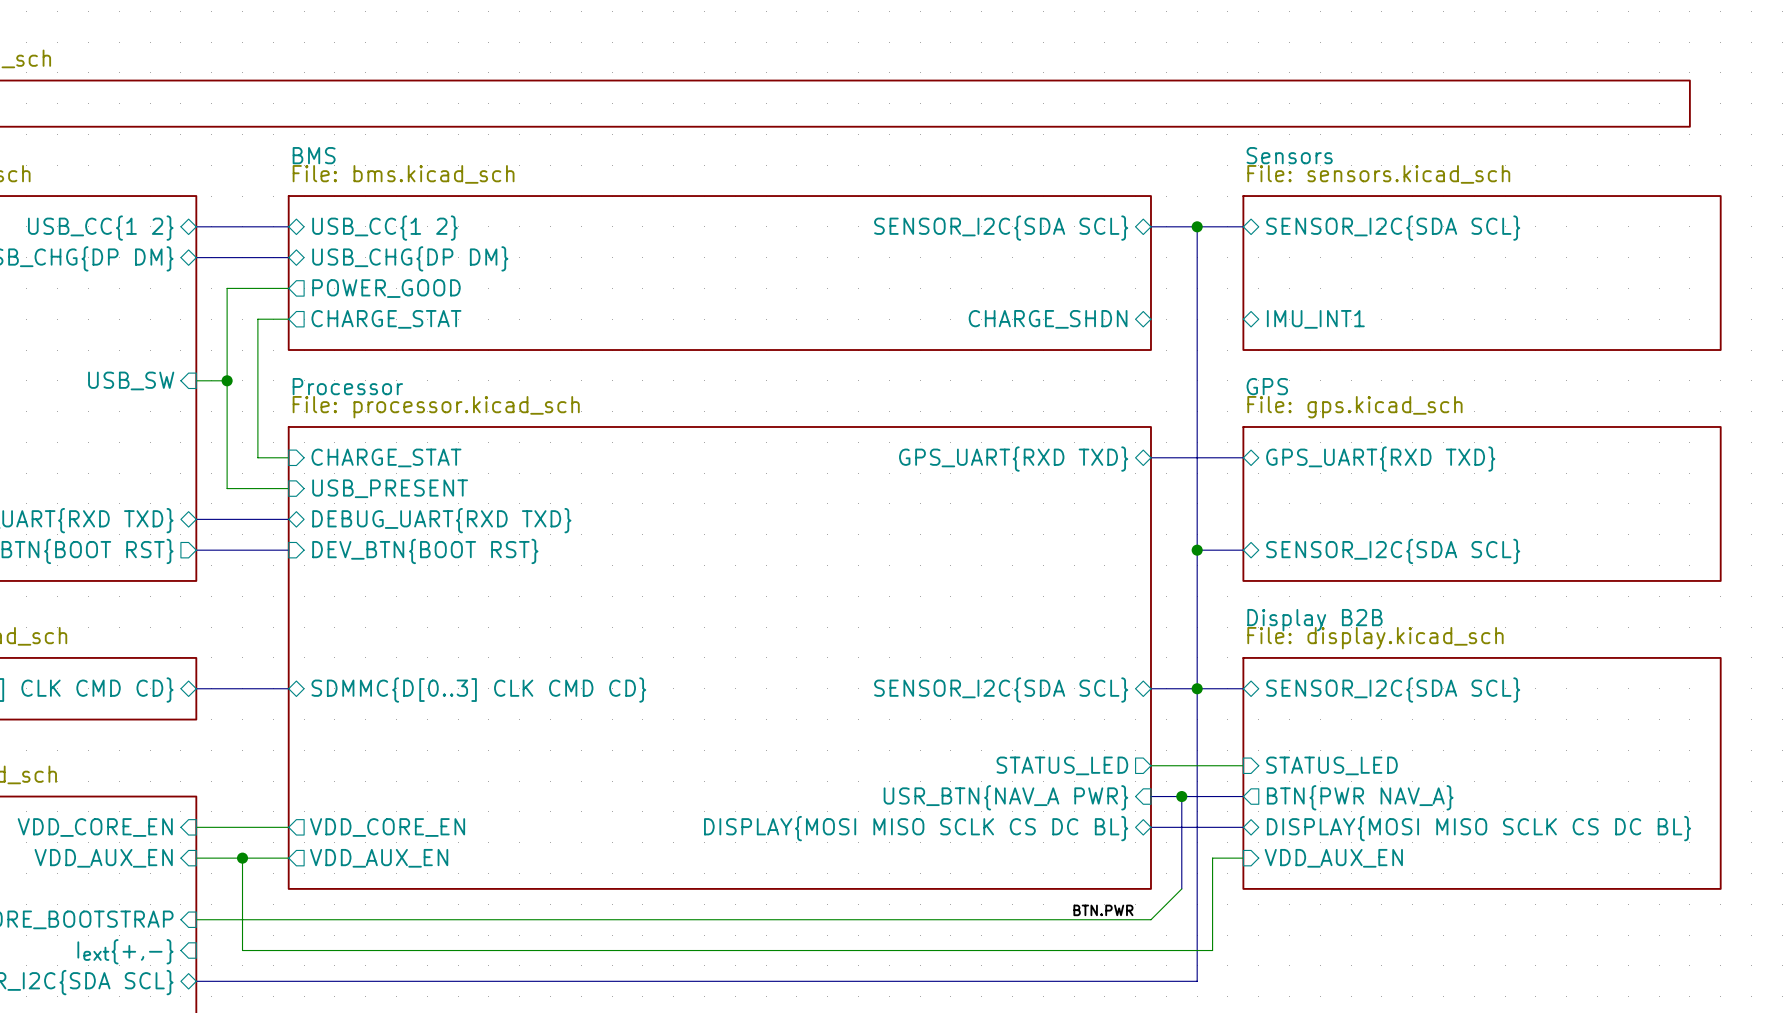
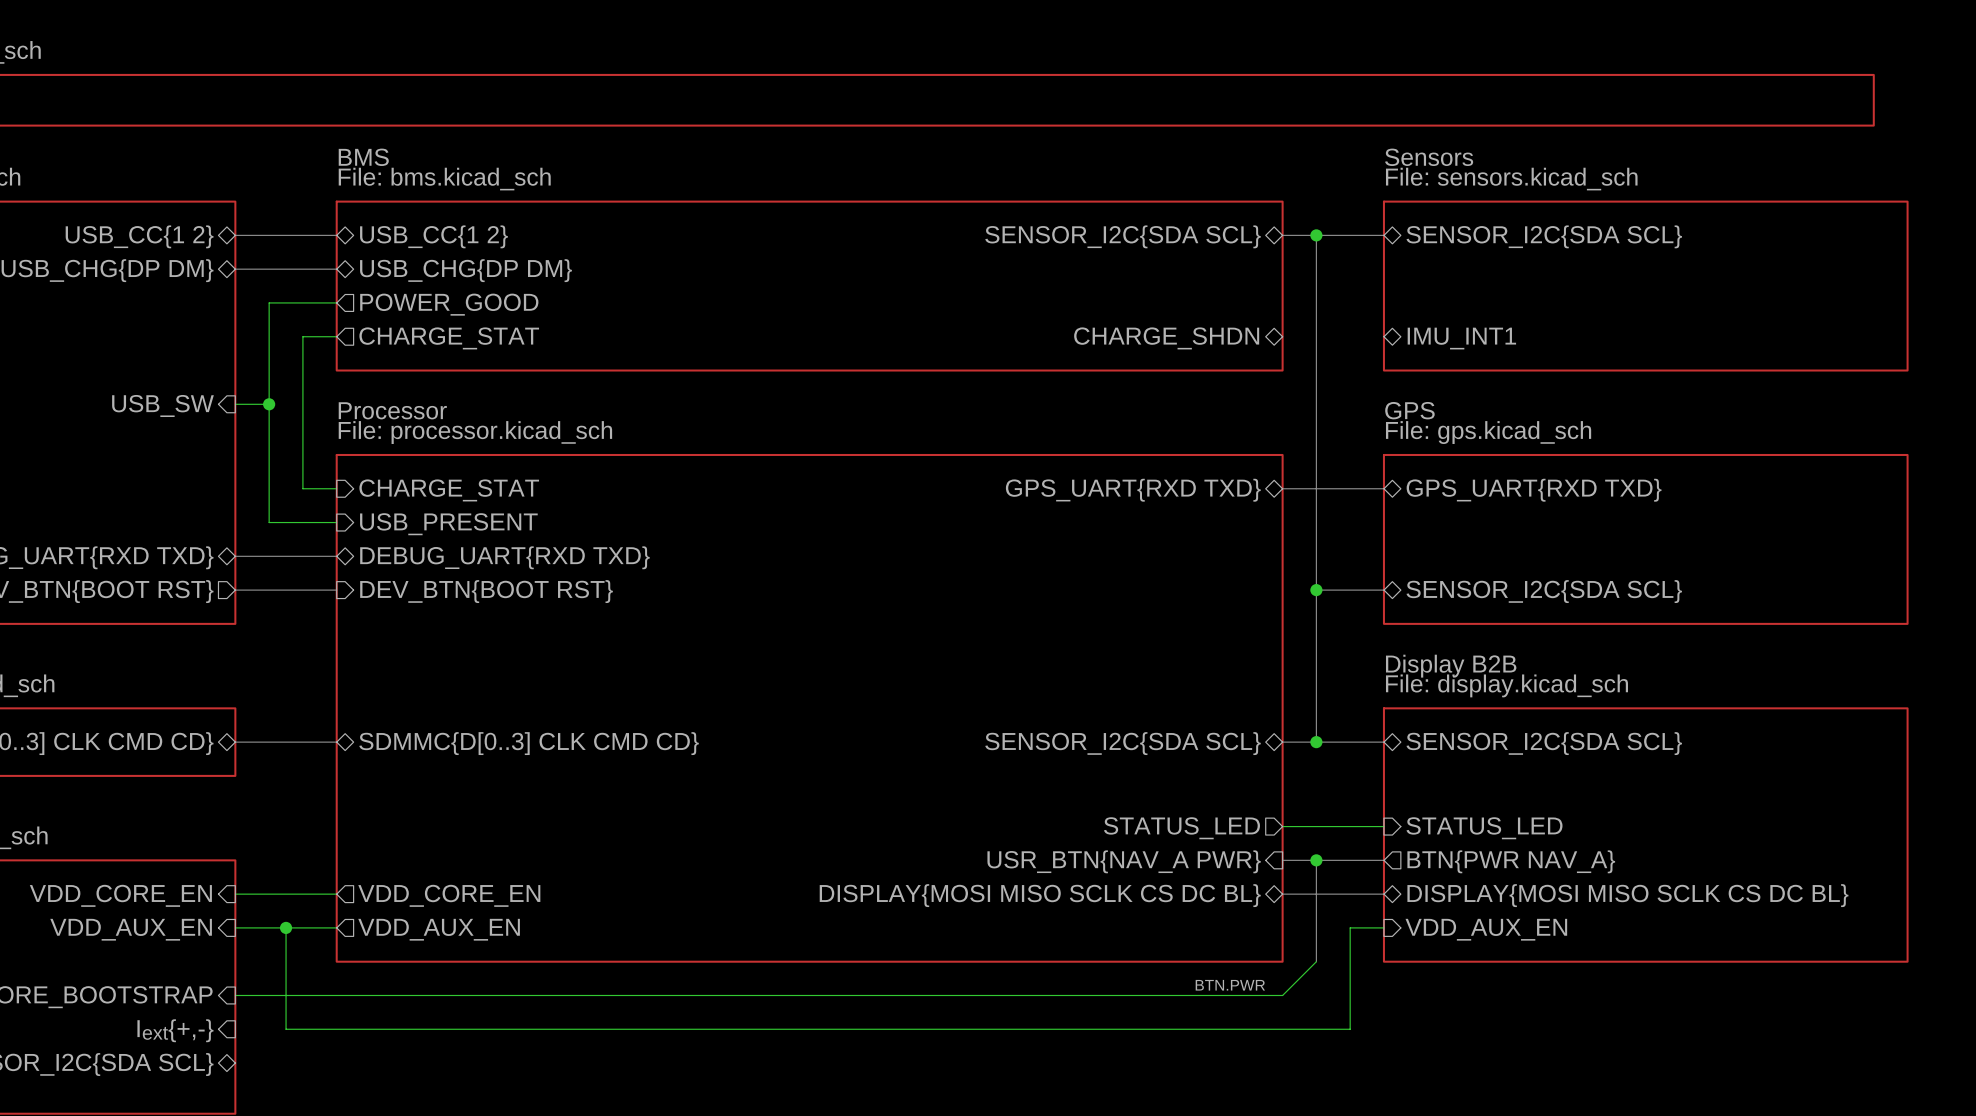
bus: none -> (1316, 235) (1316, 742)
bus: (1197, 226) (1197, 981) (196, 981) -> none
junction position: (1197, 226) -> (1316, 235)
bus: none -> (1316, 590) (1333, 590)
junction position: (1197, 550) -> (1316, 590)
junction position: (1197, 688) -> (1316, 742)

